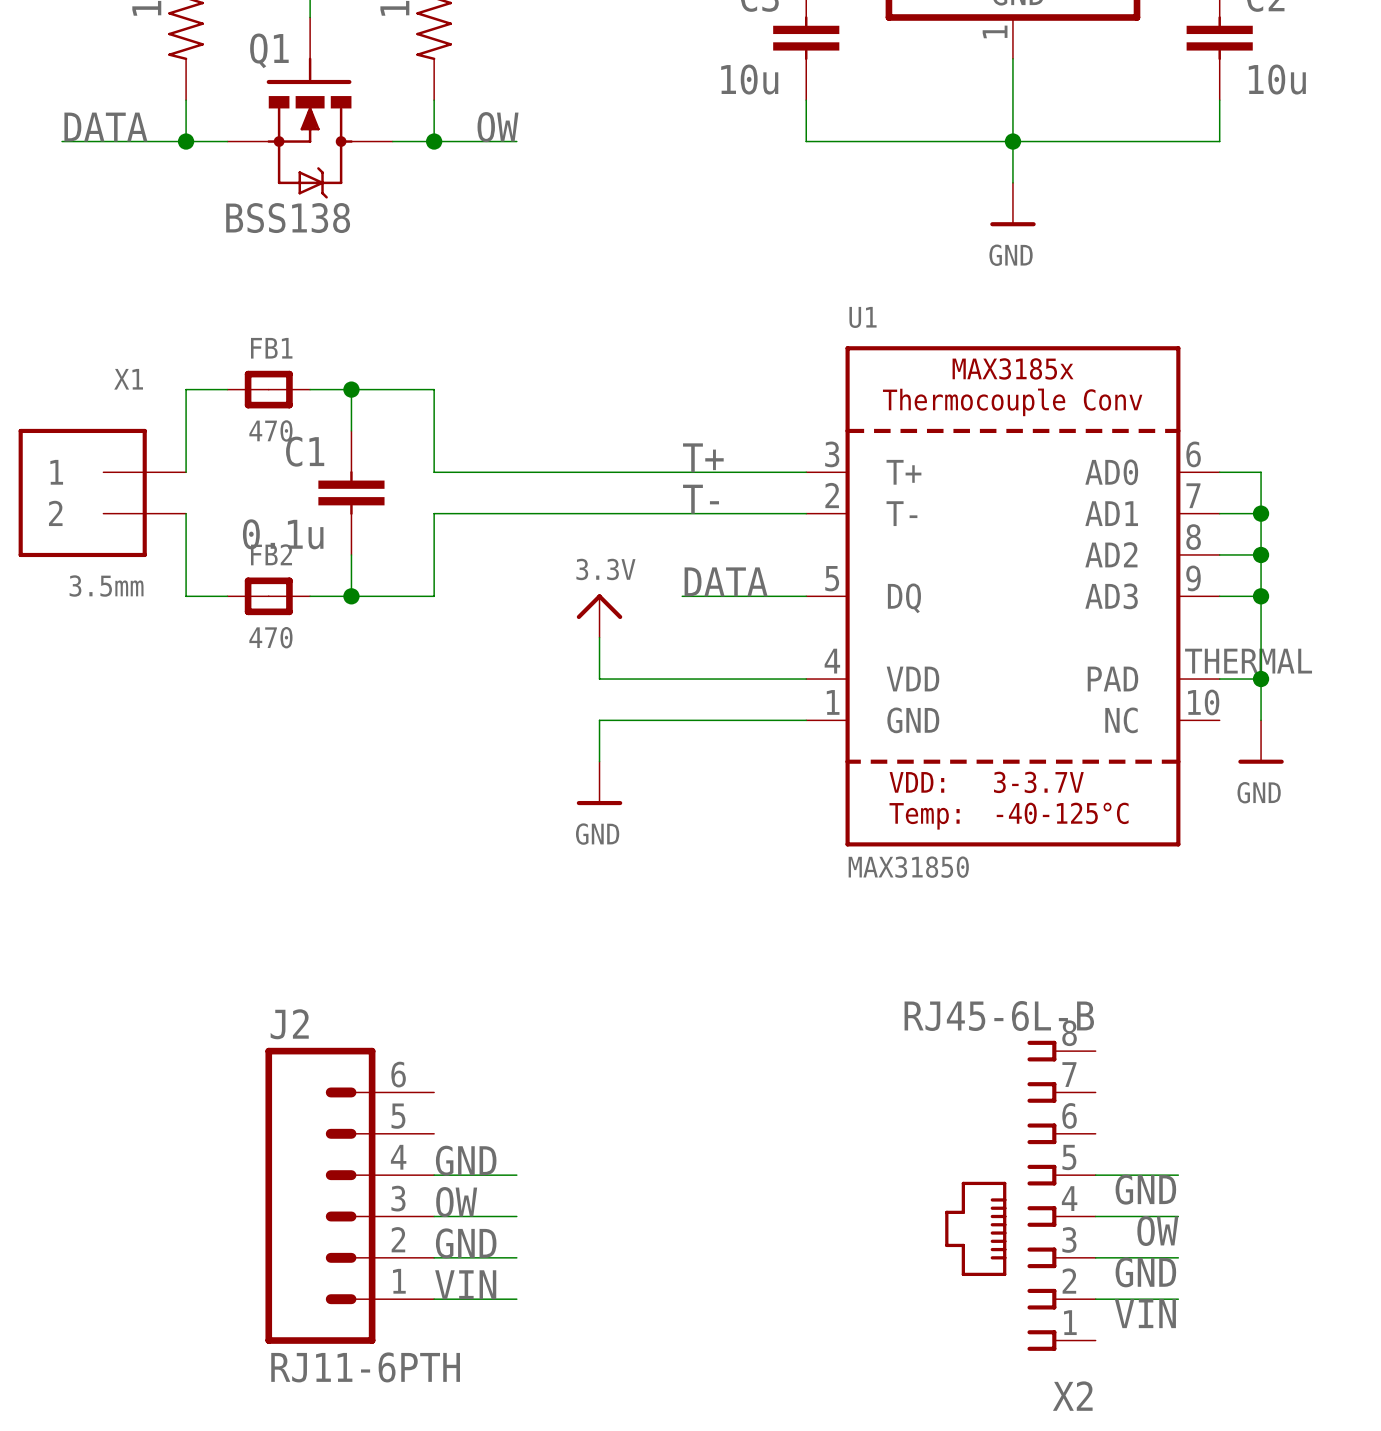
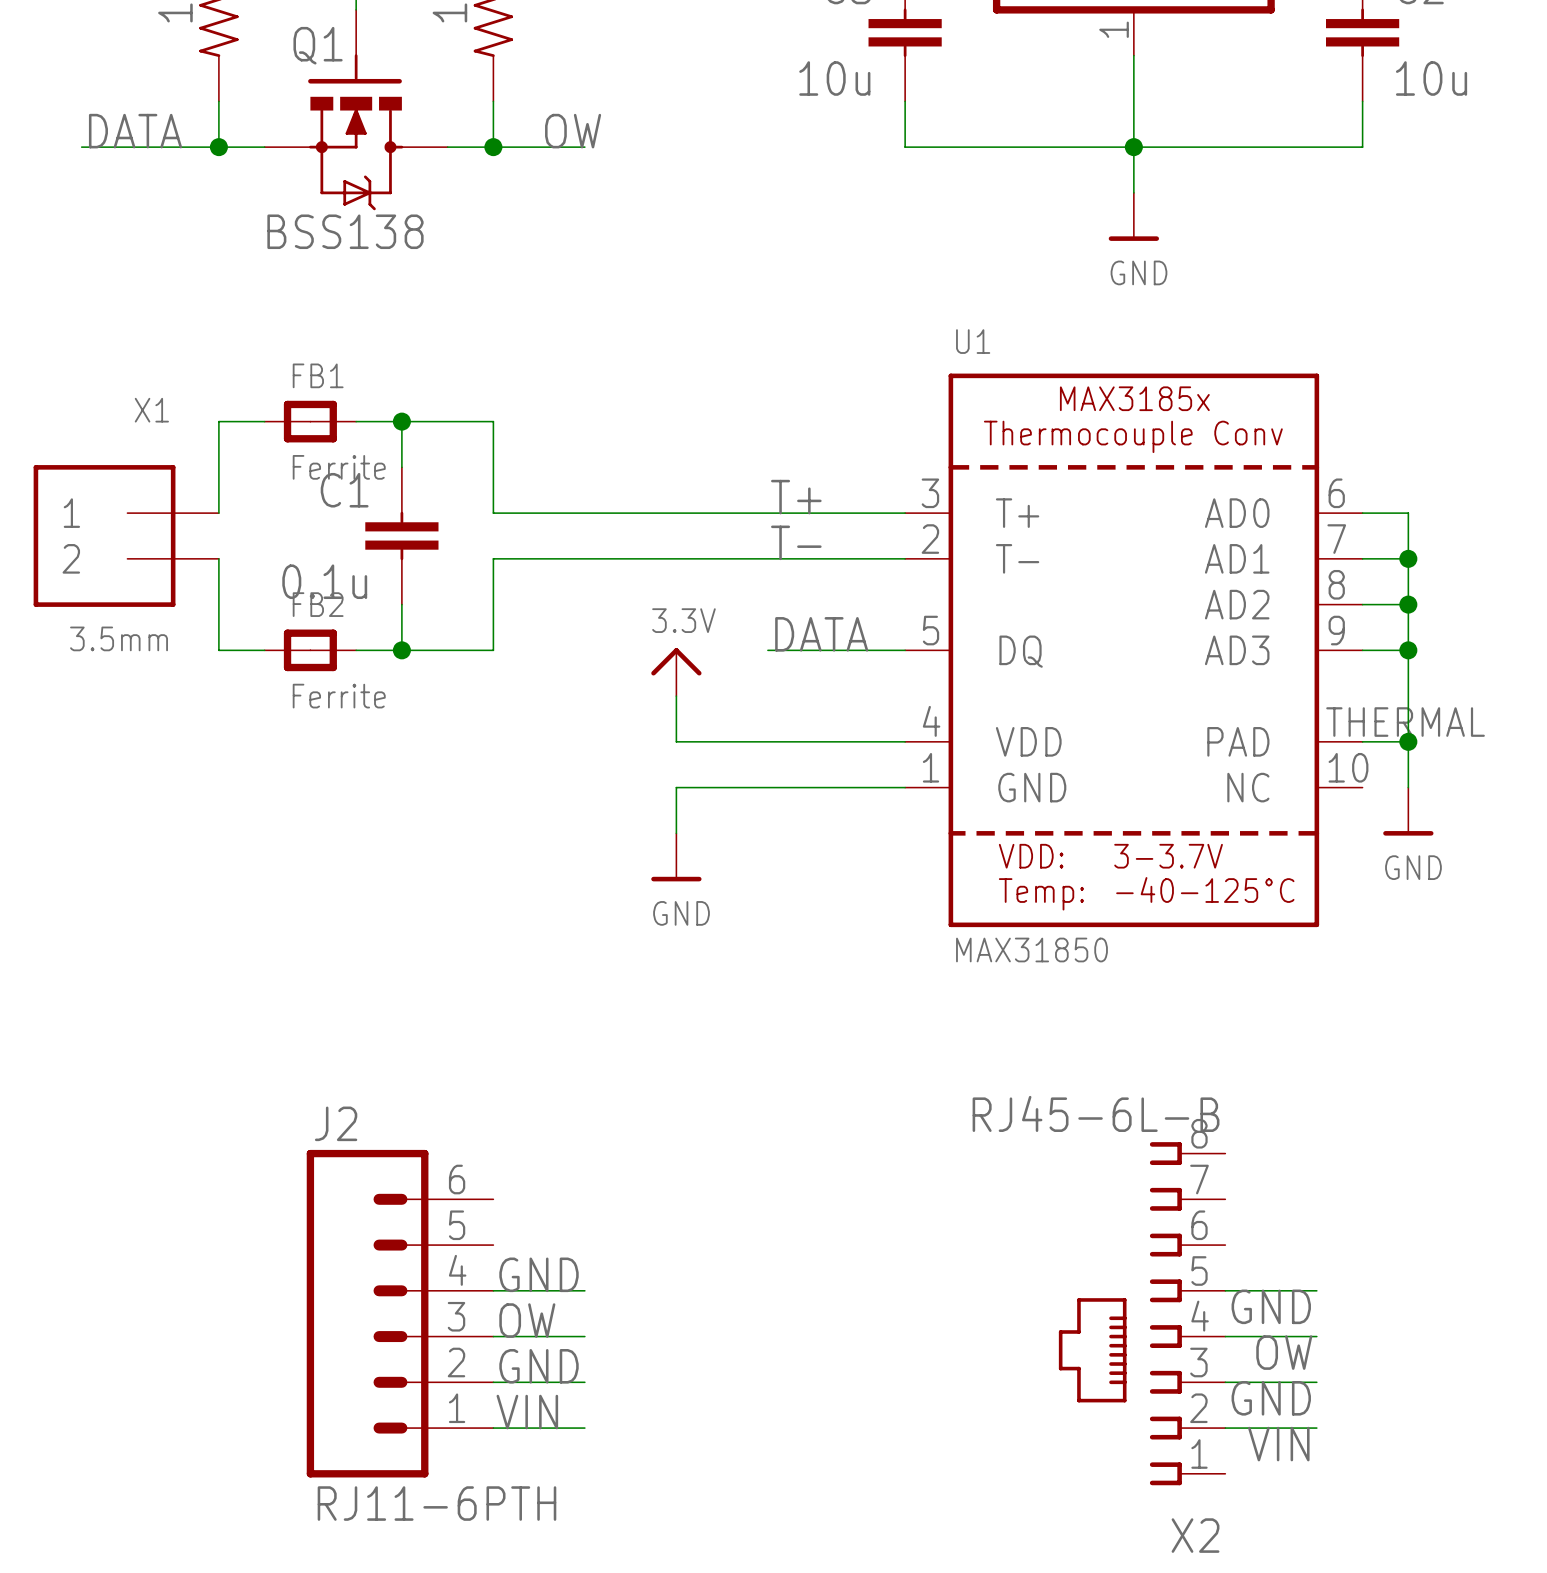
FB1 value: 470 (270, 430) -> Ferrite (339, 467)
FB2 value: 470 (270, 637) -> Ferrite (339, 696)

